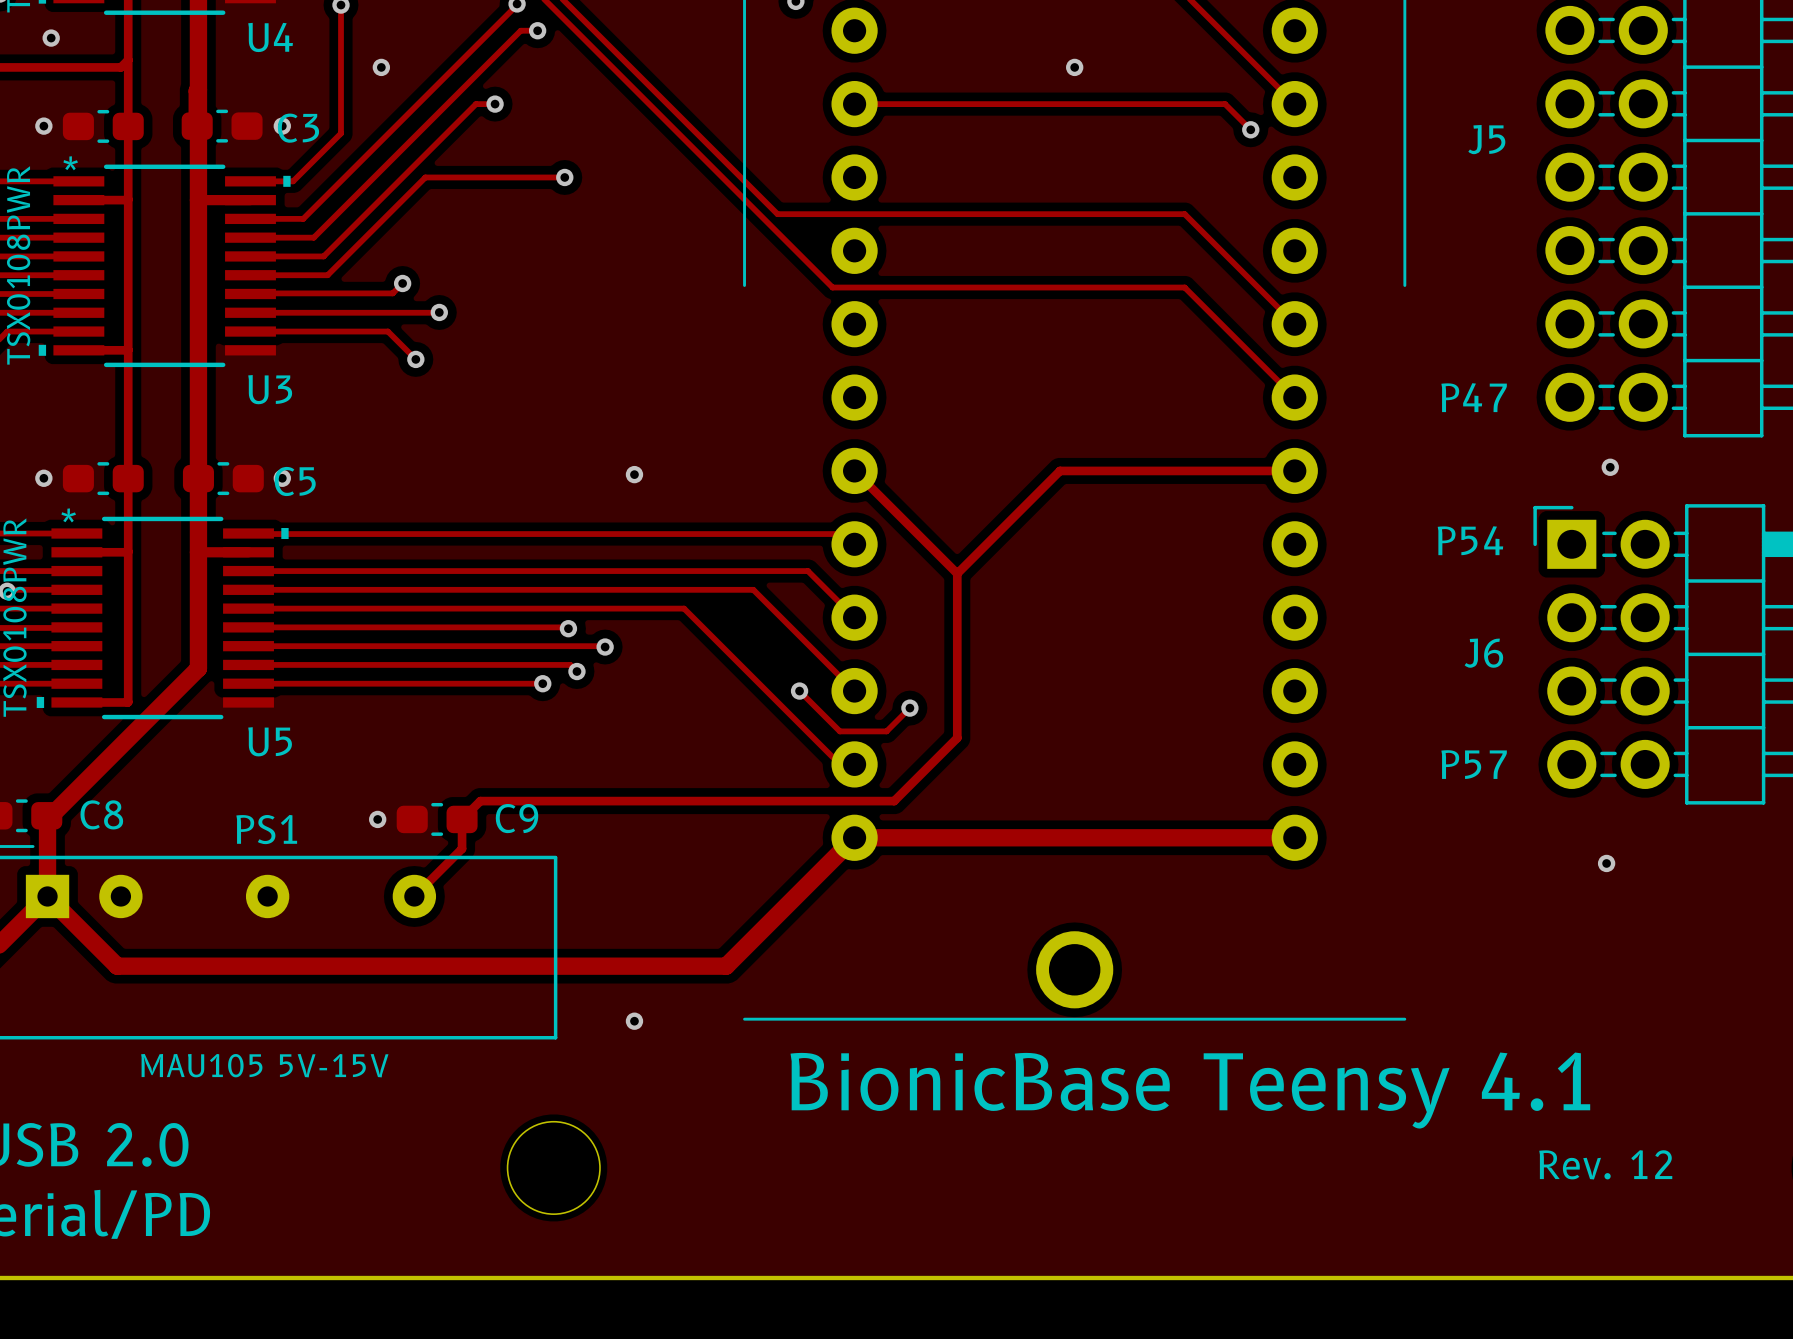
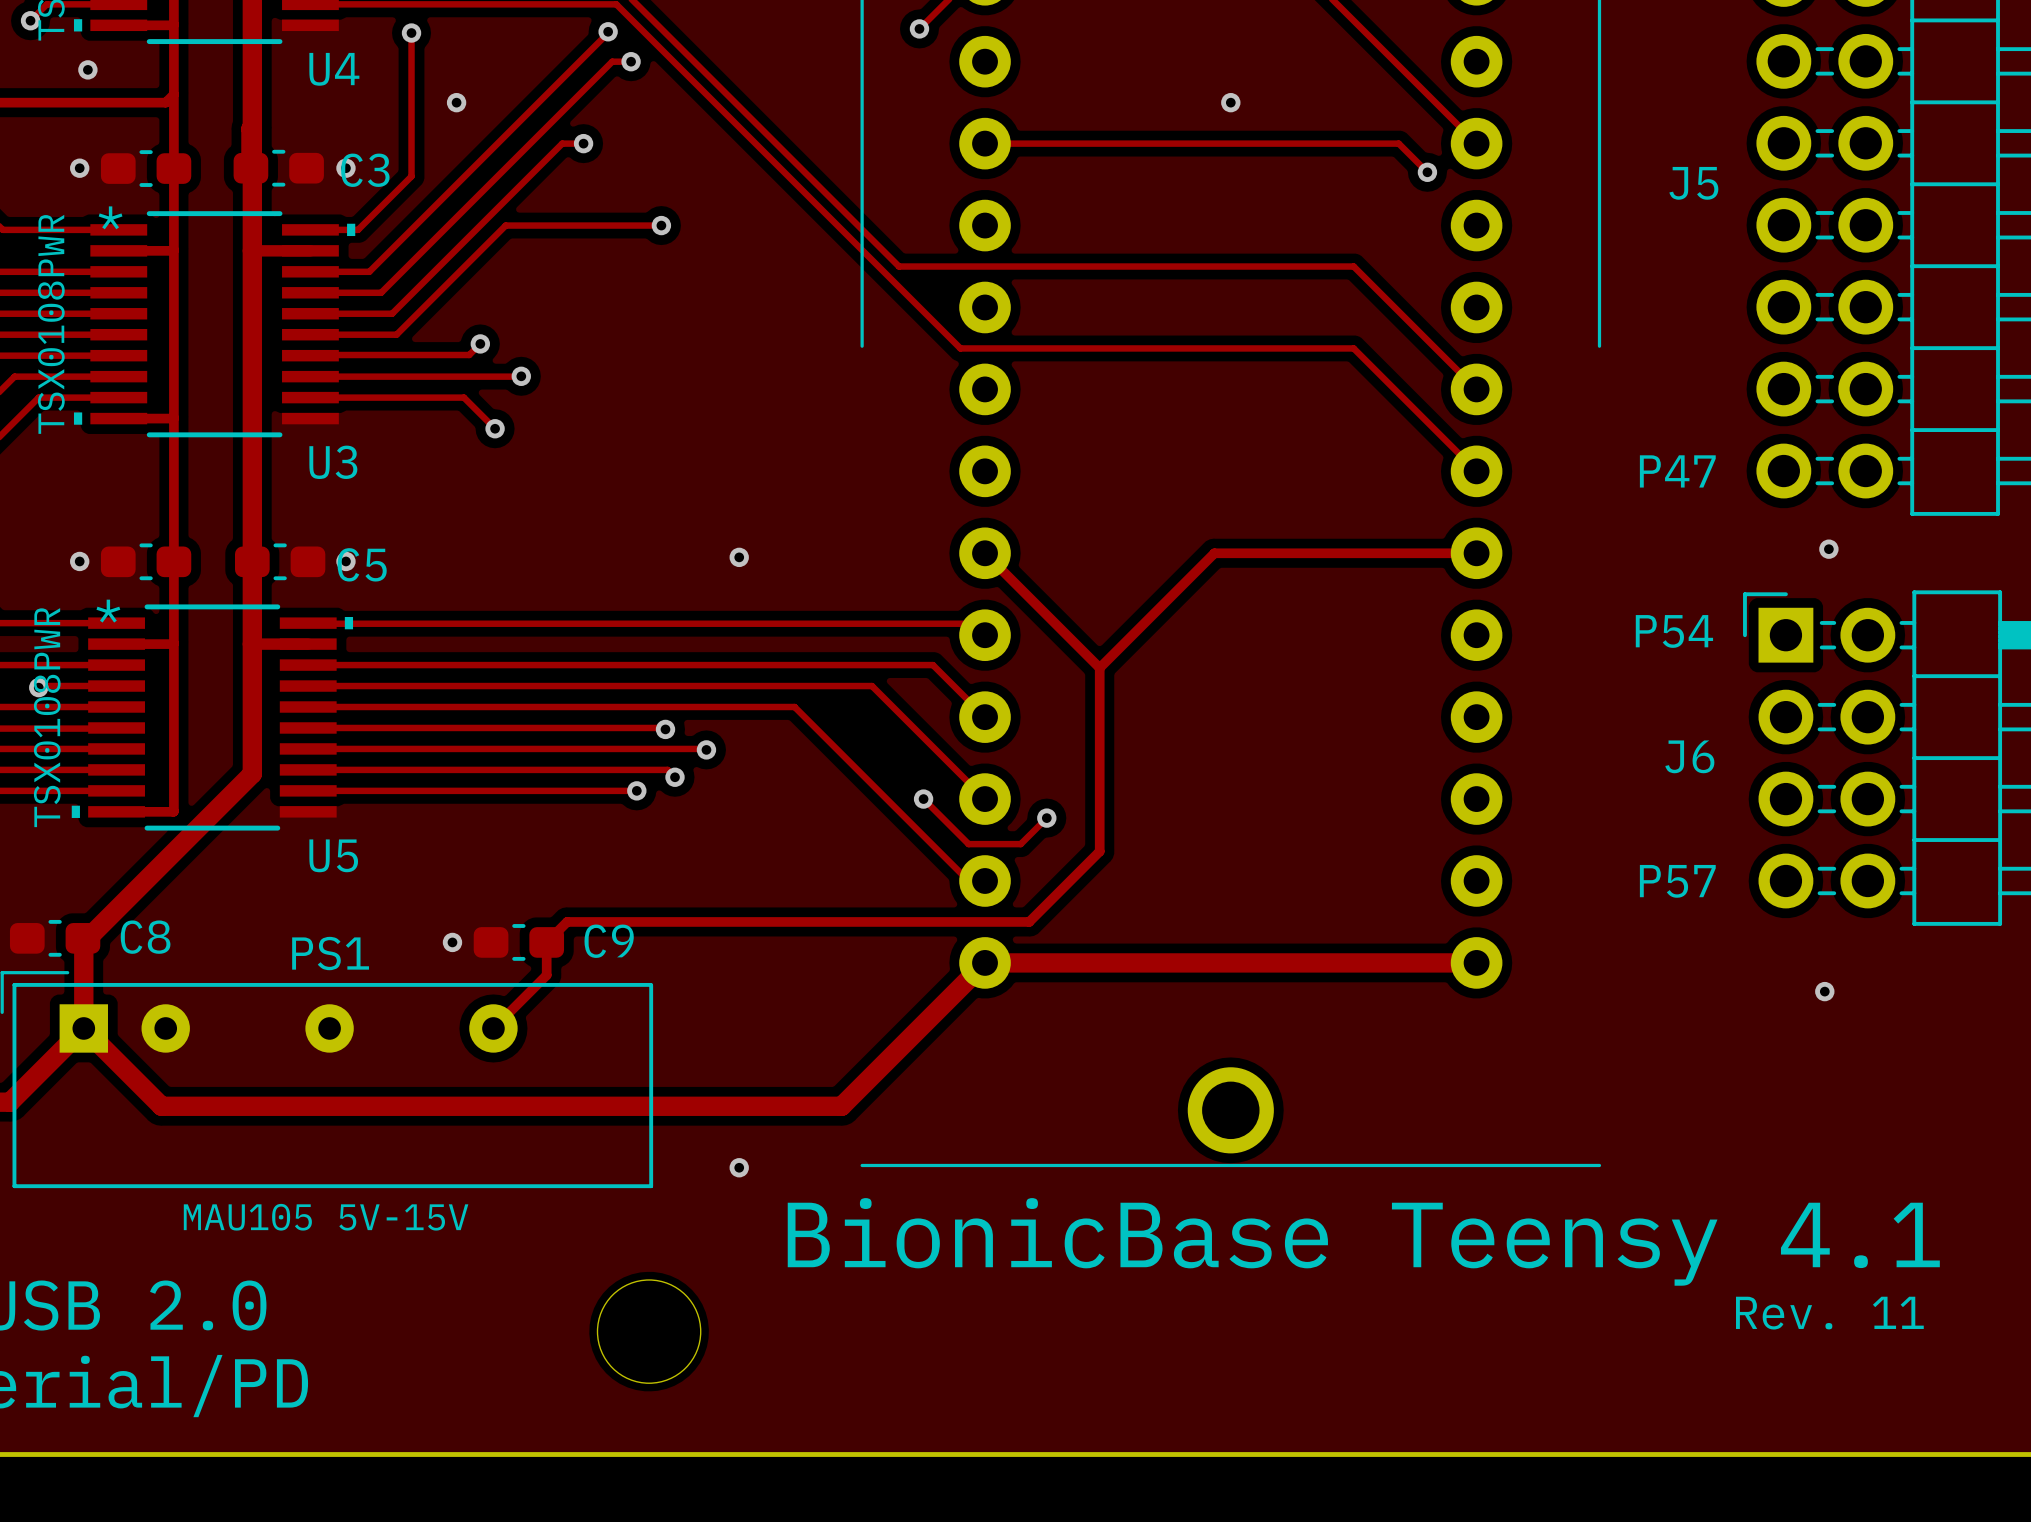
text: Rev. 12 (1605, 1164) -> Rev. 11 (1829, 1313)

